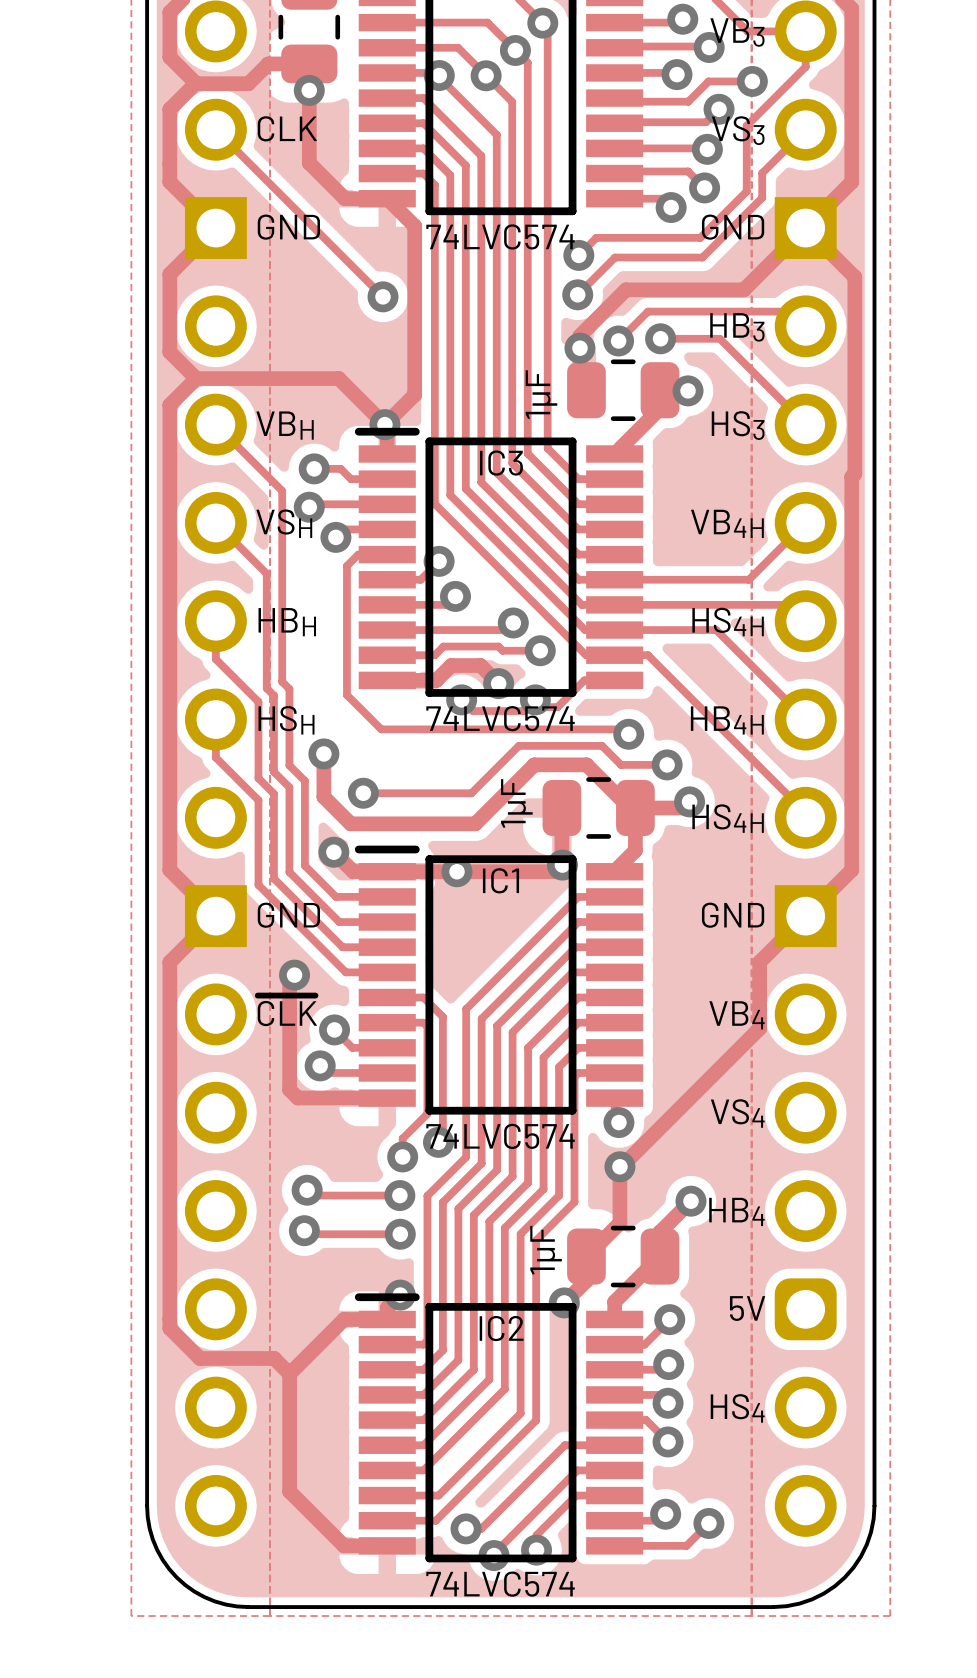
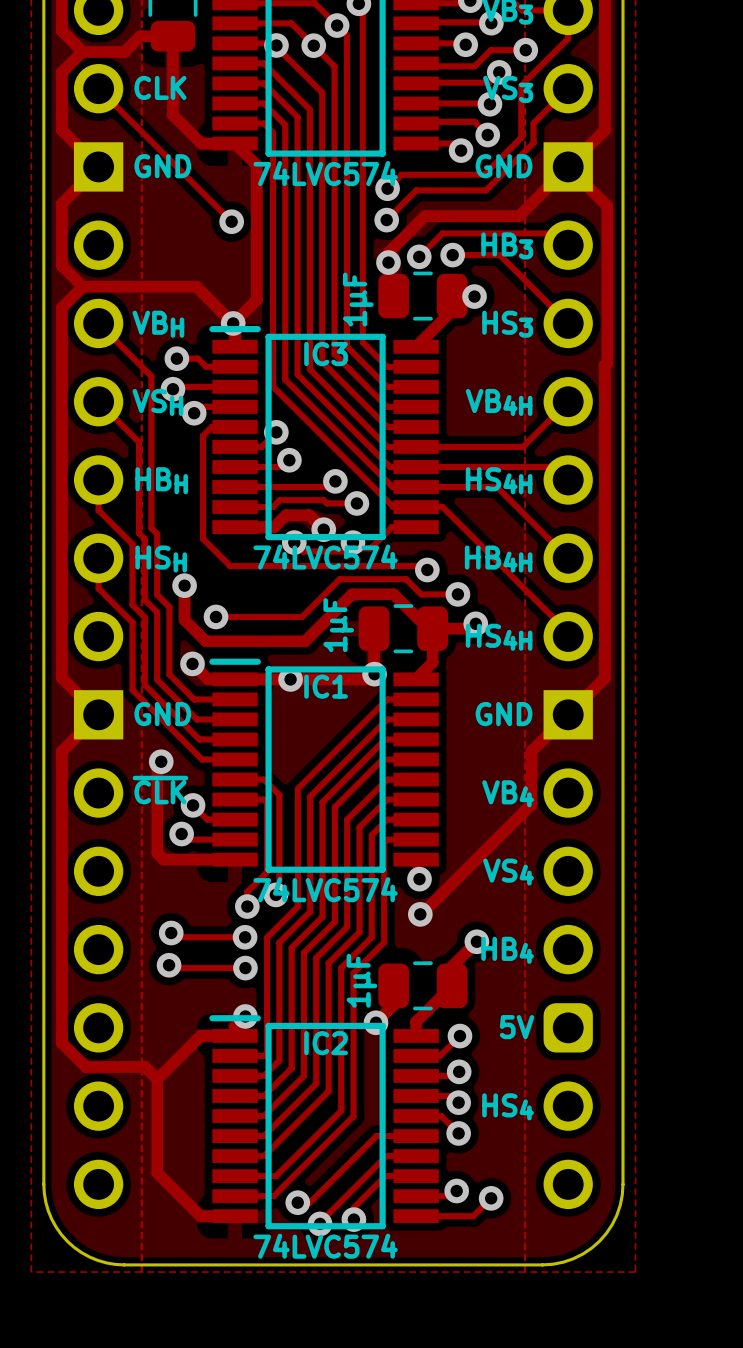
via: (309, 90) -> none
track: (619, 1166) (619, 1223) (586, 1256) -> none

